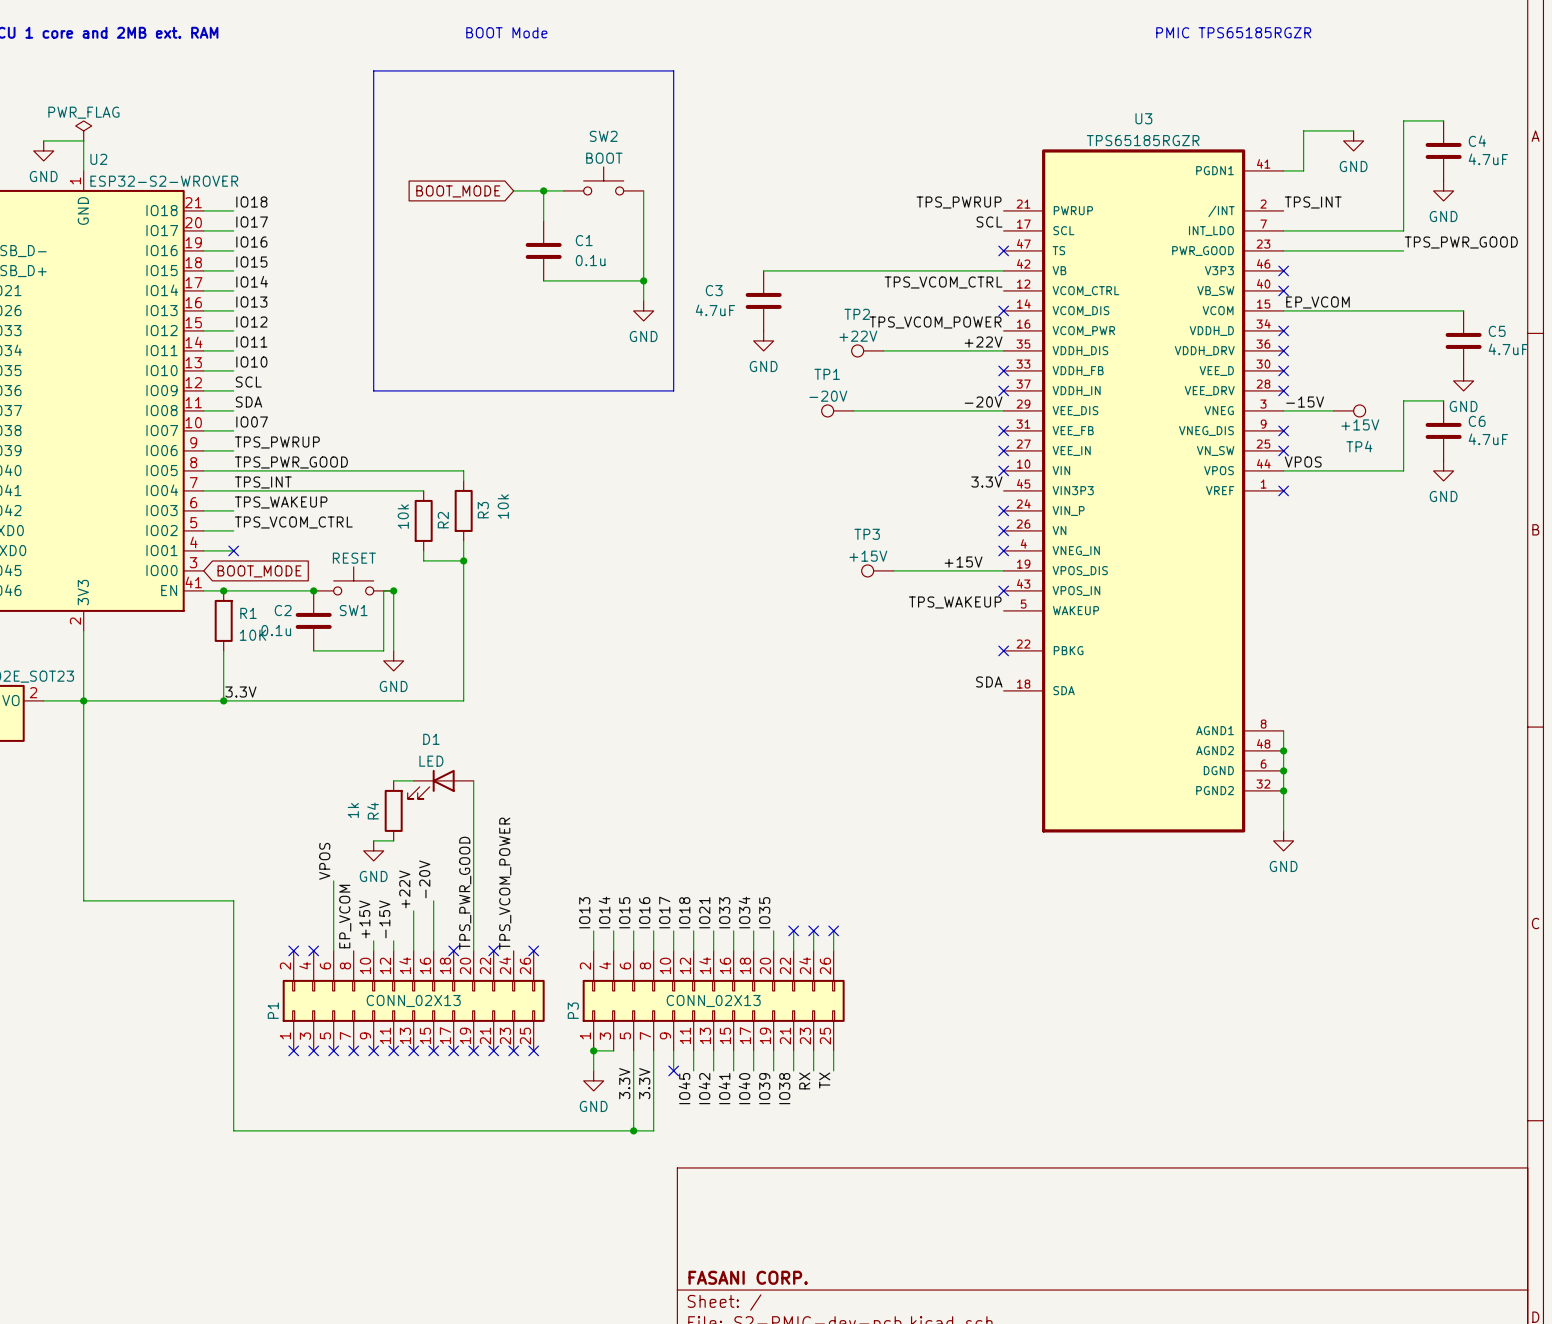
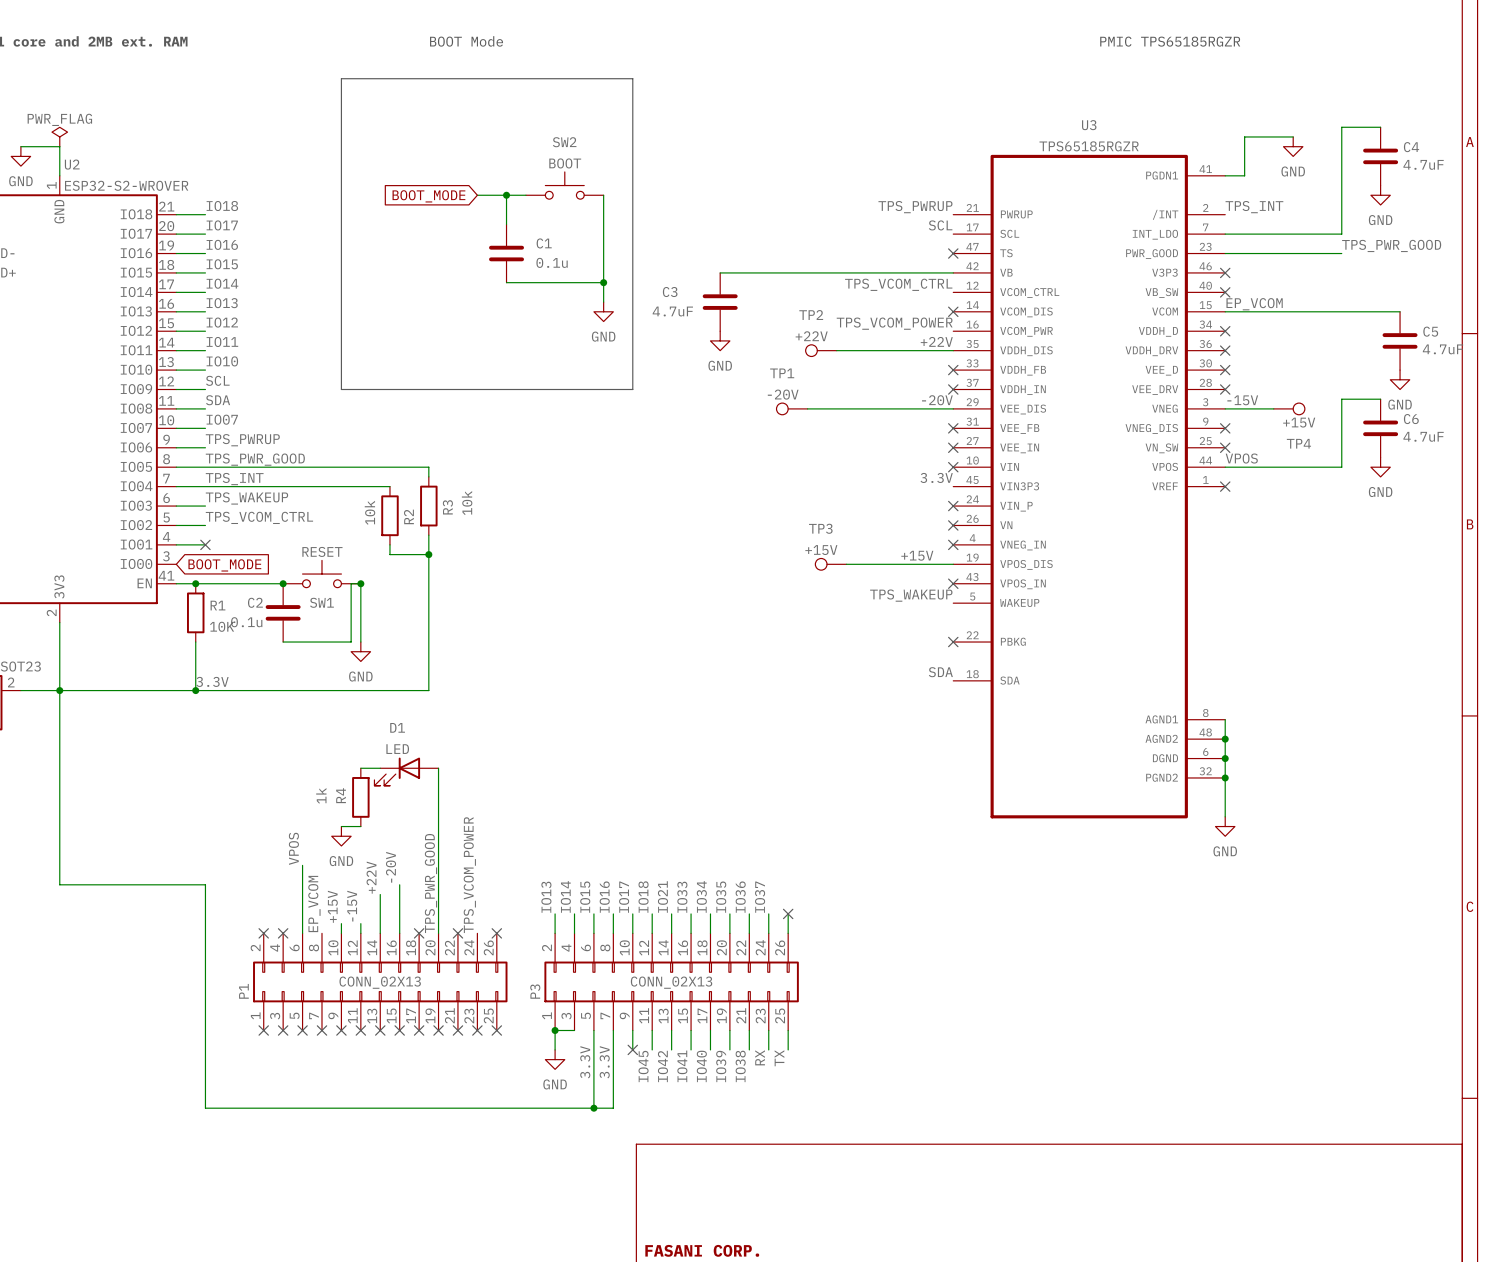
label: none -> IO36 (740, 897)
label: none -> IO37 (760, 897)
no-connect mark: (793, 930) -> none
no-connect mark: (813, 930) -> none

